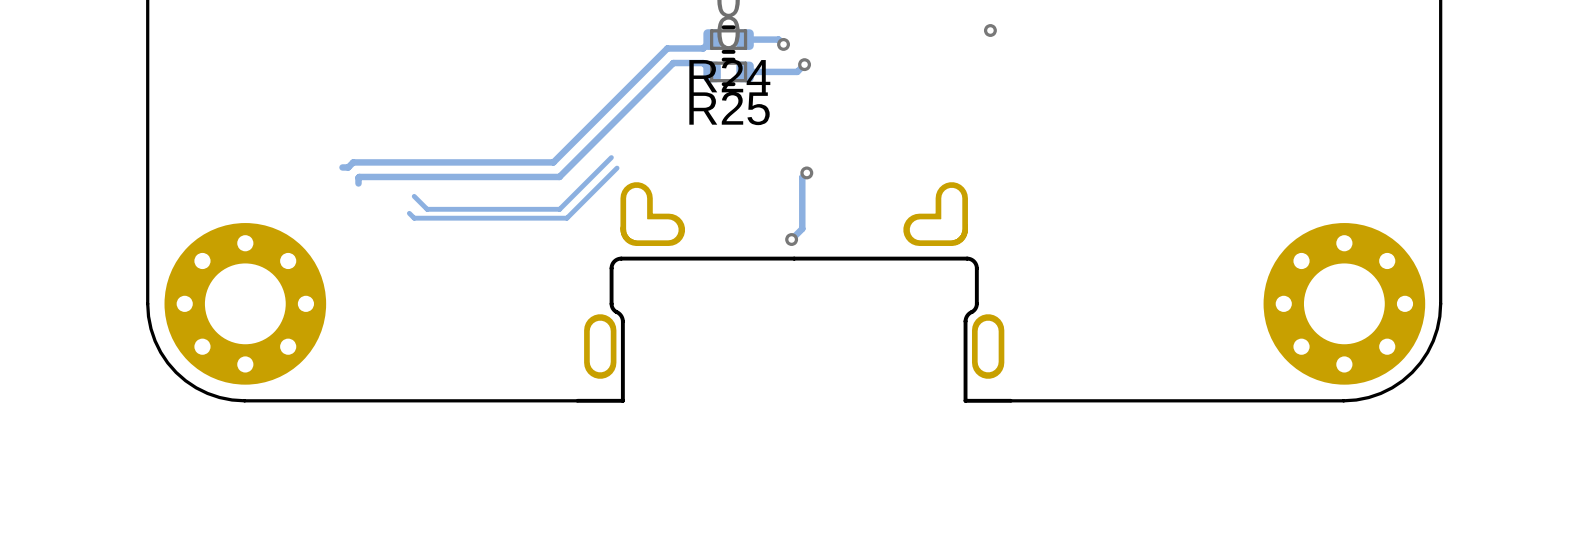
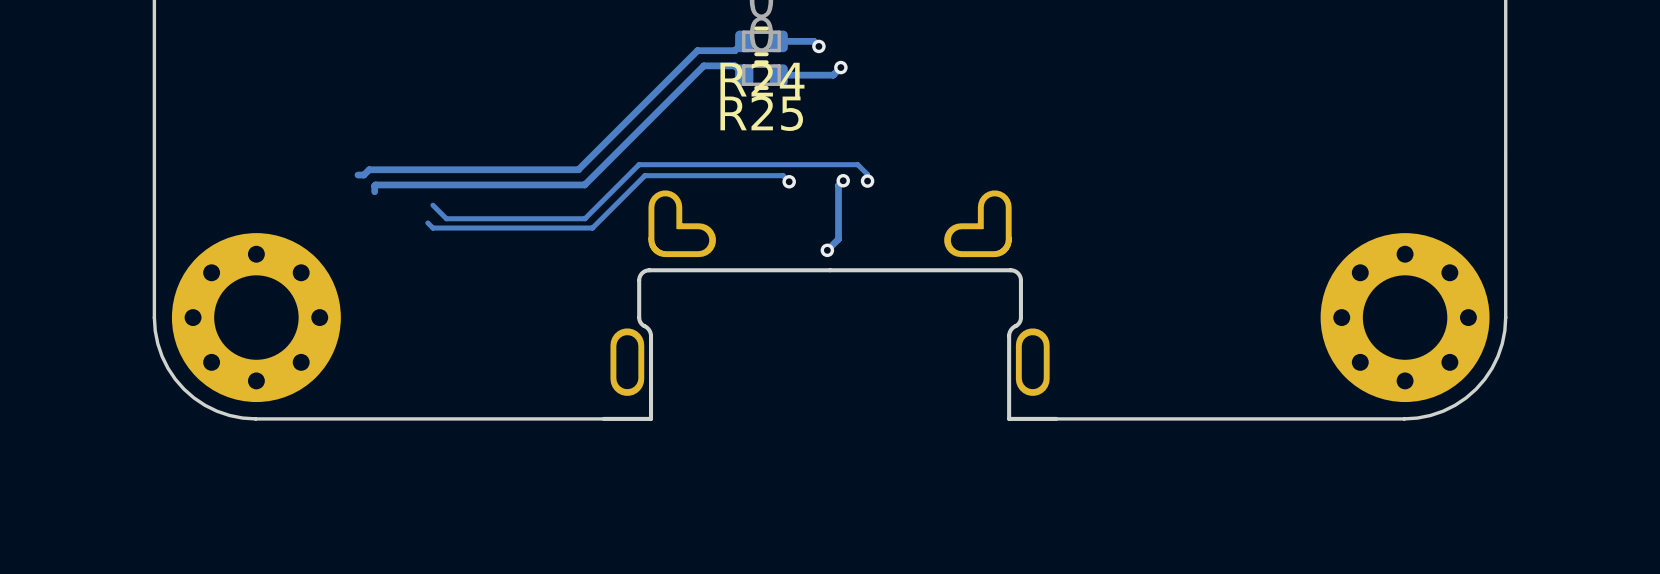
via: (990, 30) -> none
track: none -> (639, 164) (857, 164) (867, 174) (867, 181)
track: none -> (644, 175) (783, 175) (789, 181)
via: none -> (789, 181)
via: none -> (867, 181)

